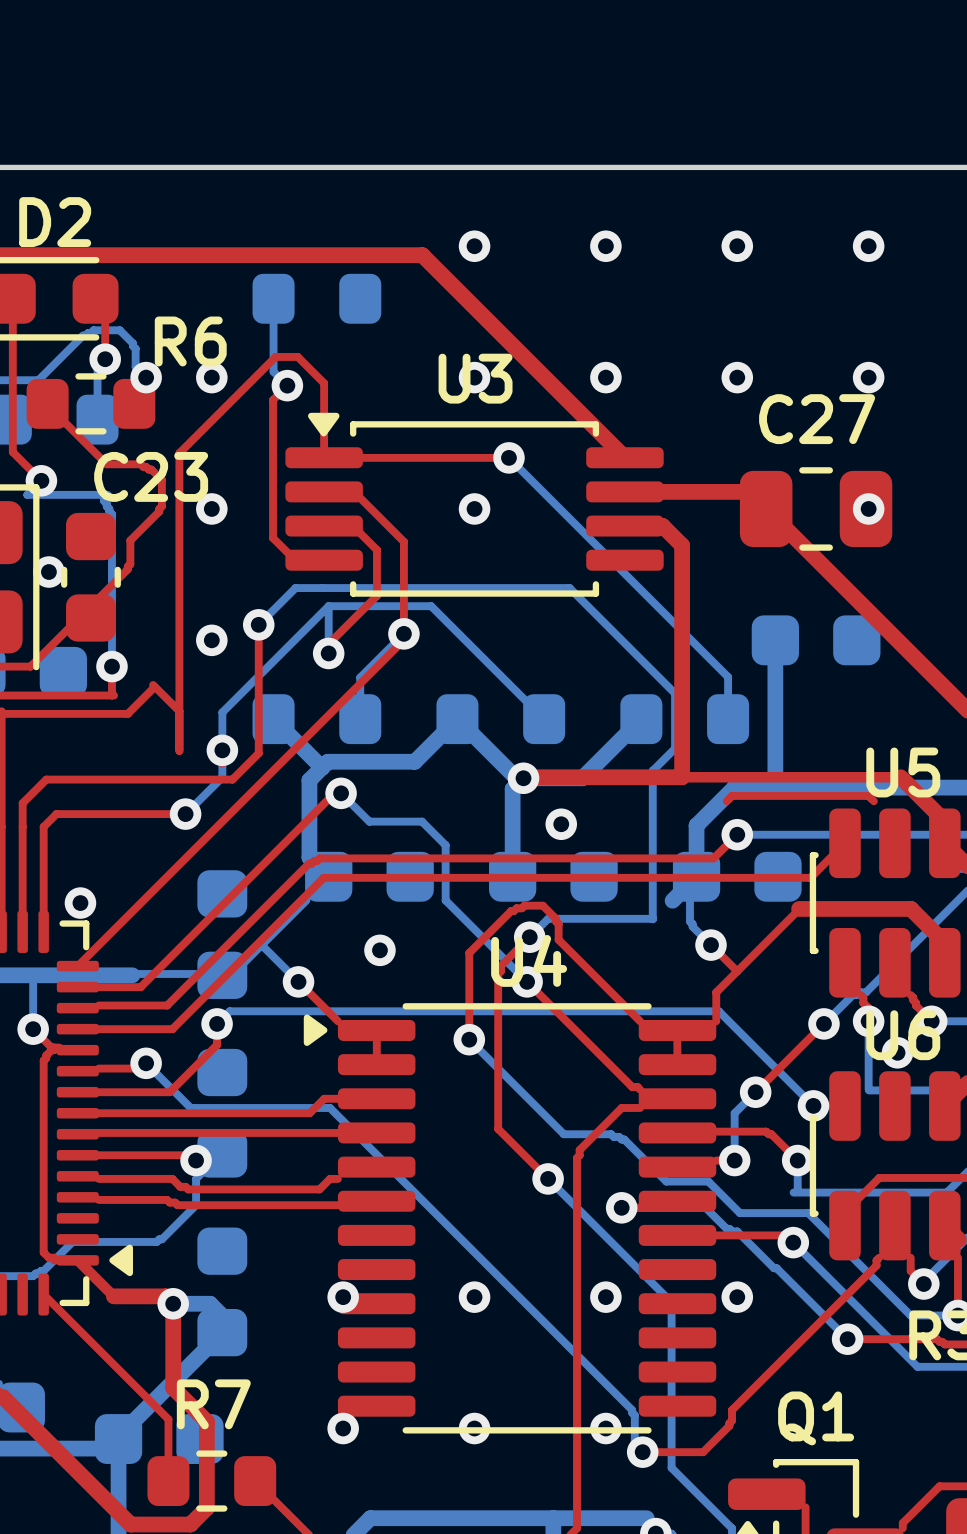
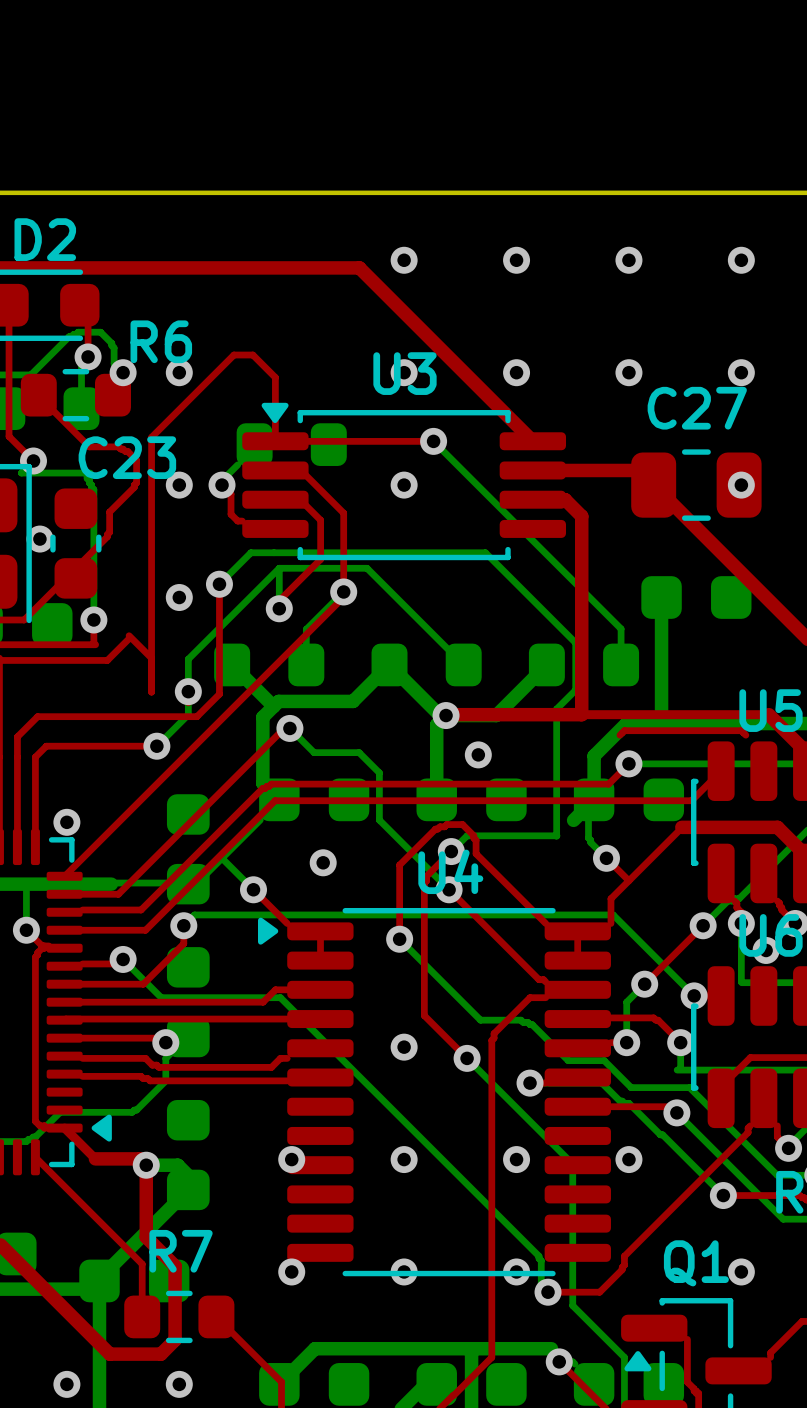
bottom track: (273, 298) (273, 371) (287, 385) -> none
part position: (316, 298) -> (291, 444)
top track: (287, 385) (273, 400) (273, 538) (295, 560) (324, 560) -> none
via position: (287, 385) -> (222, 485)
bottom track: none -> (237, 464) (222, 480) (222, 485)
top track: none -> (222, 485) (231, 494) (231, 514) (237, 521) (242, 521)
via: none -> (404, 1047)
via: none -> (741, 1271)

